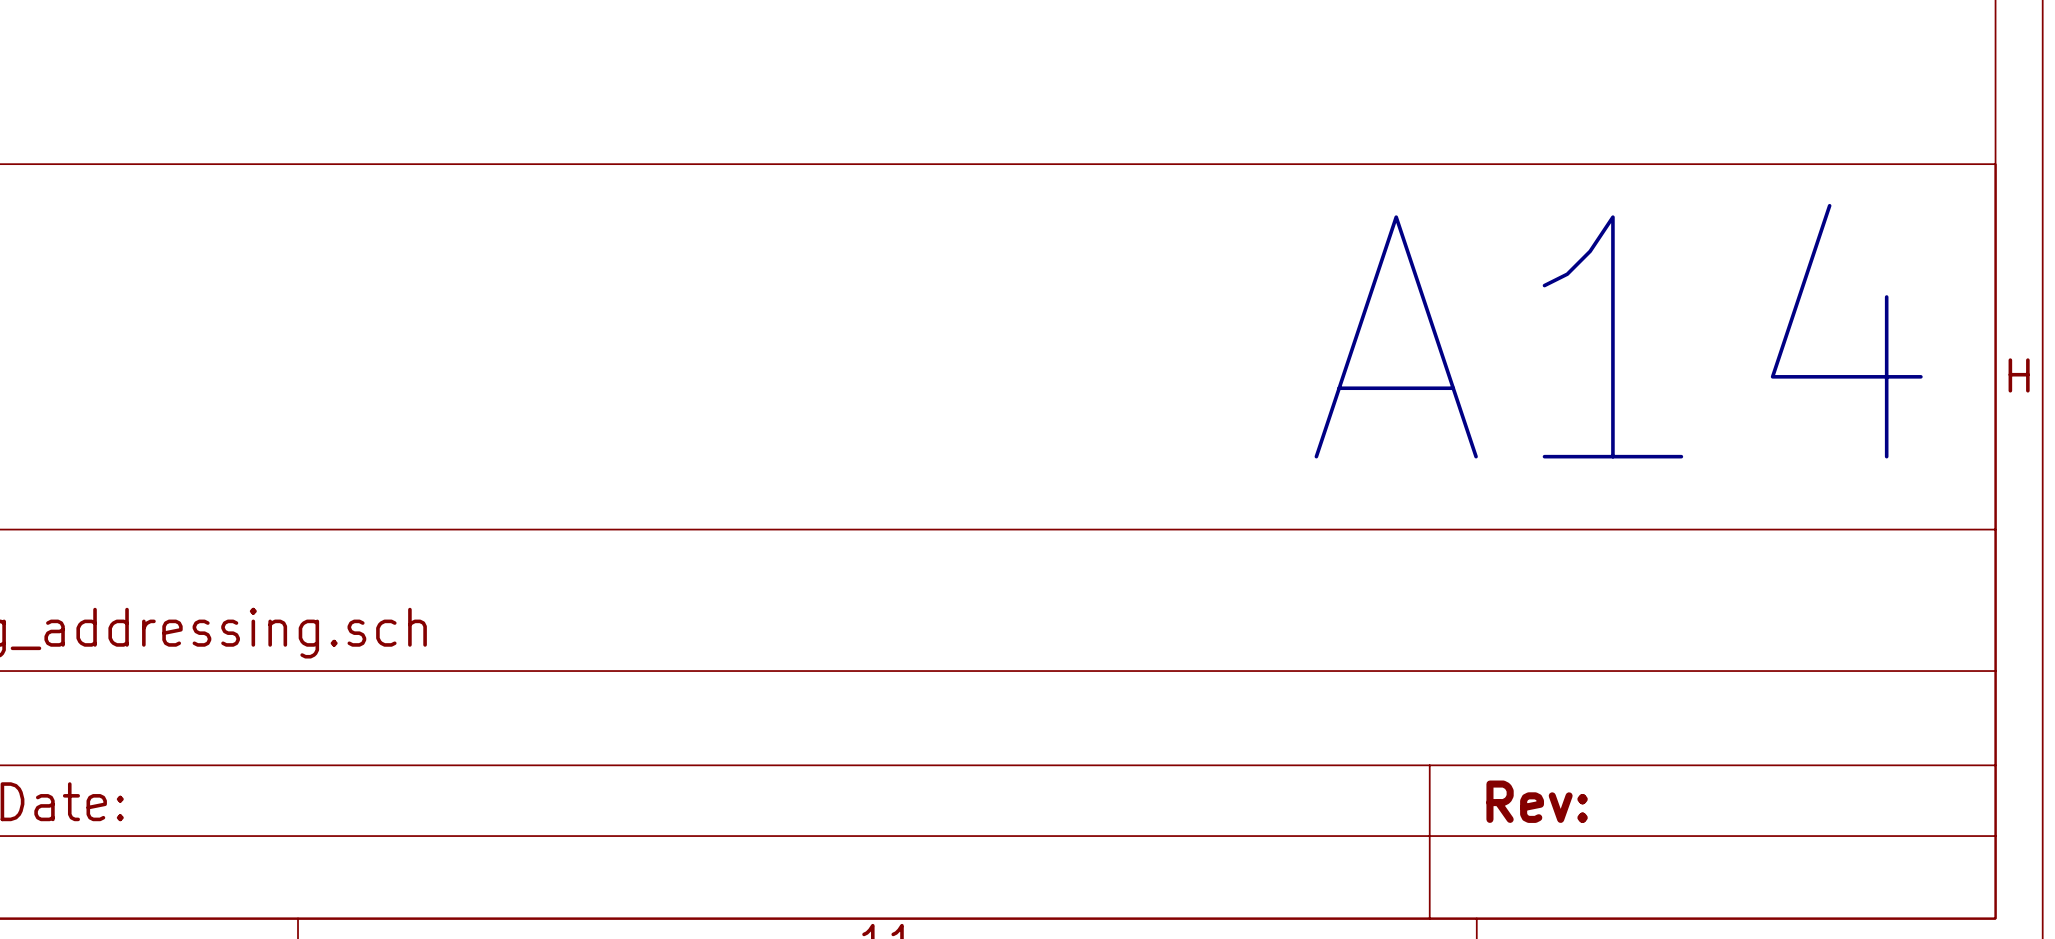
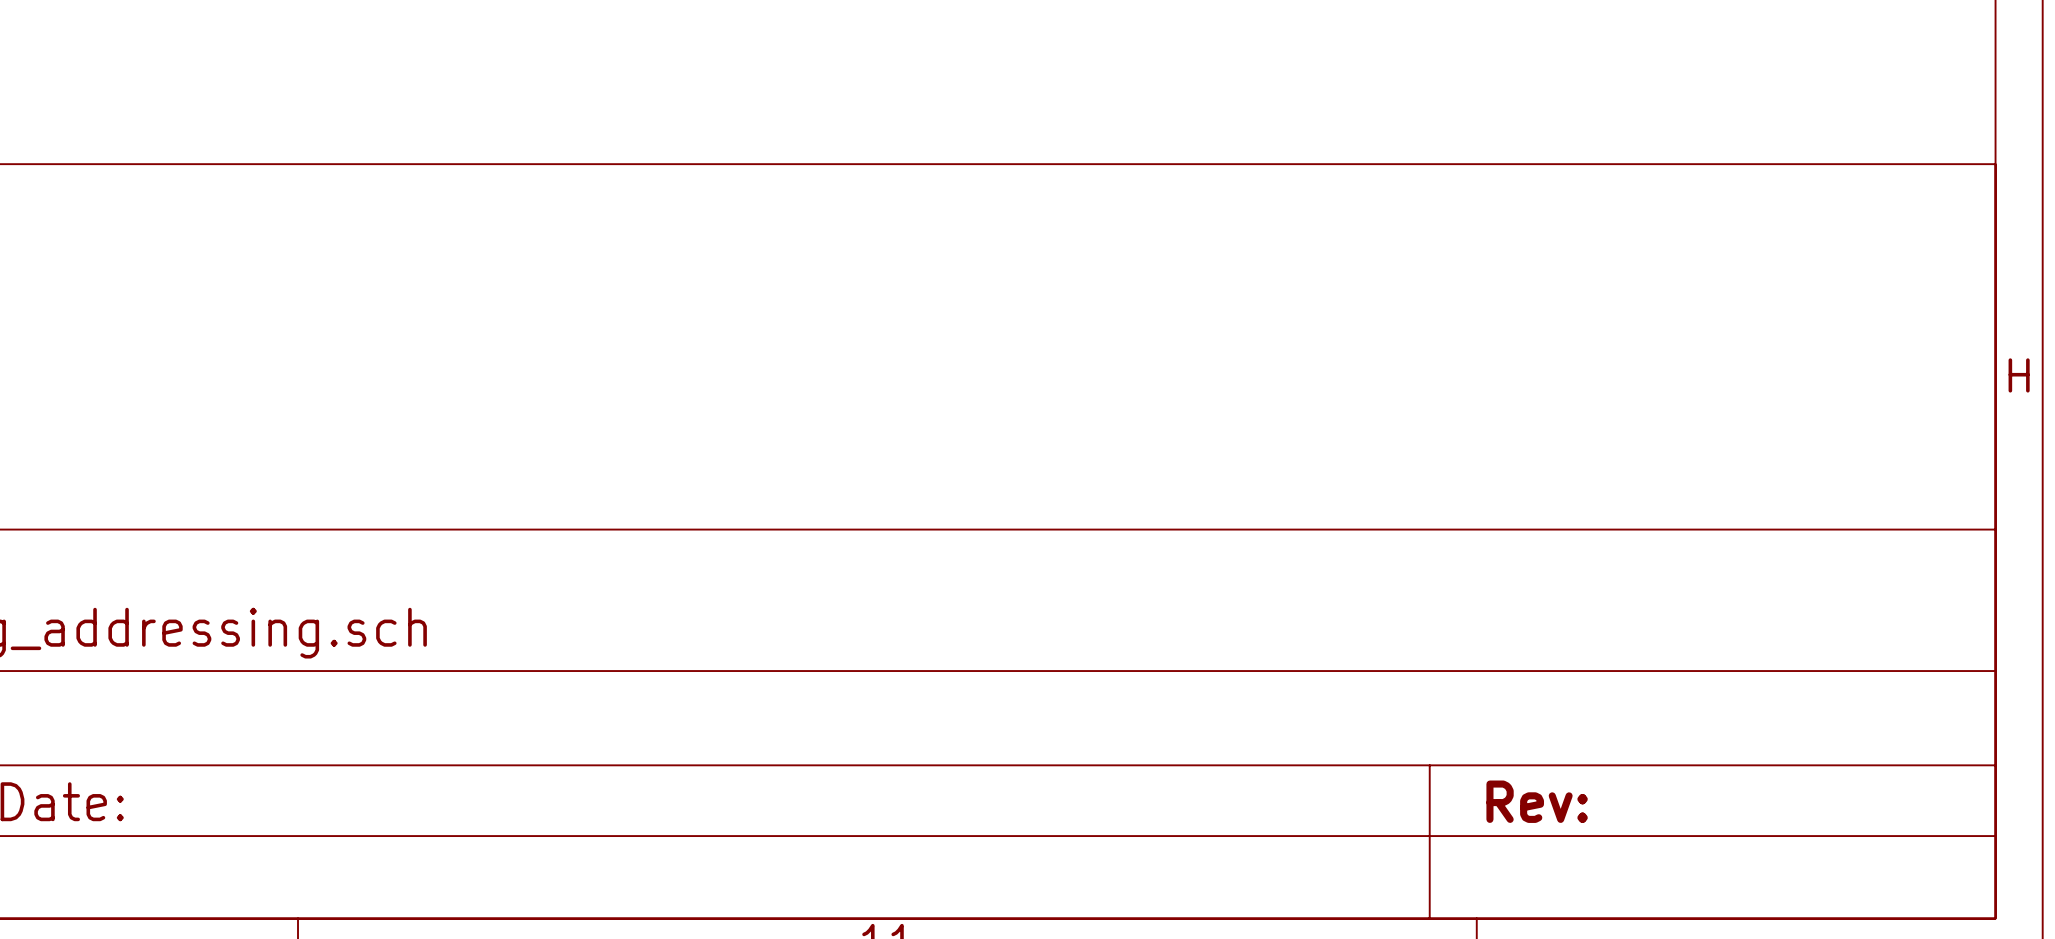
text: A14 (1618, 331) -> none

